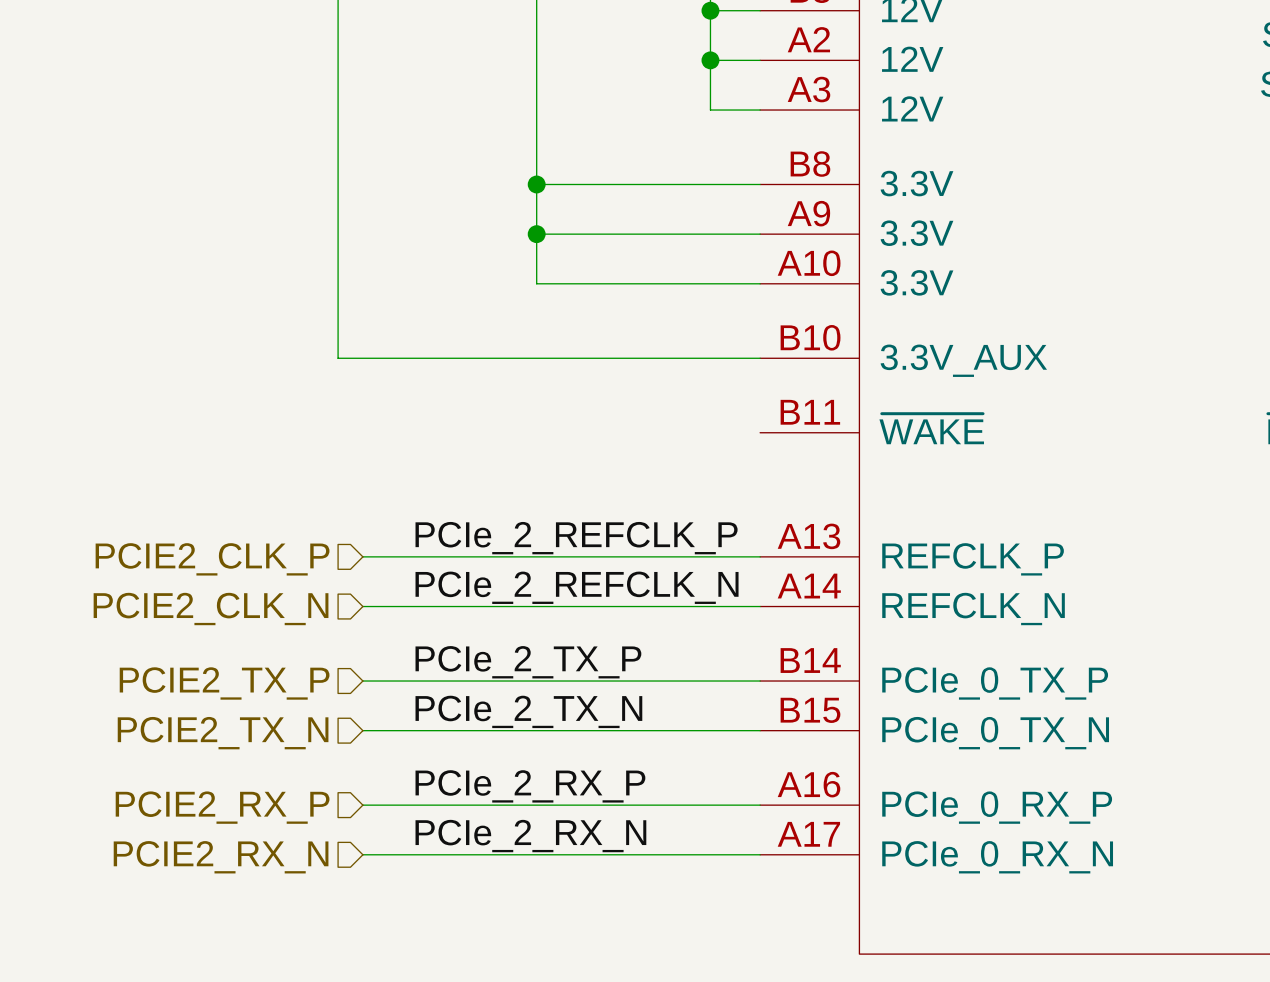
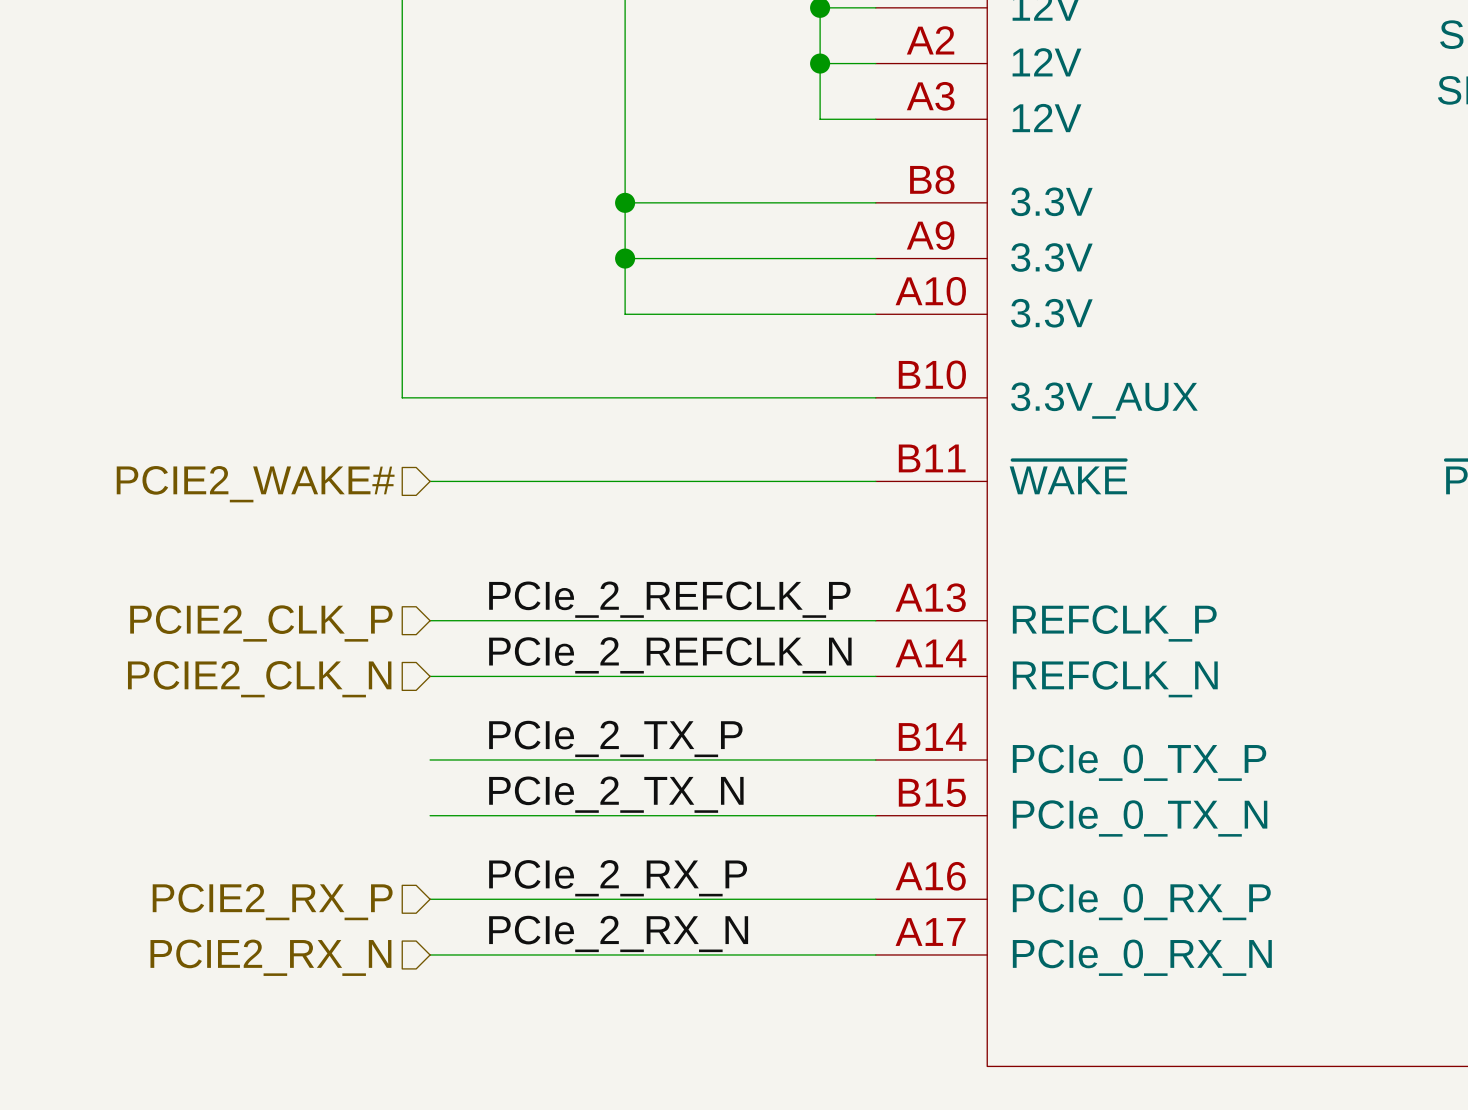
wire: none -> (430, 481) (875, 481)
hierarchical label: none -> PCIE2_WAKE# (255, 484)
hierarchical label: PCIE2_TX_P (224, 683) -> none
hierarchical label: PCIE2_TX_N (223, 733) -> none

